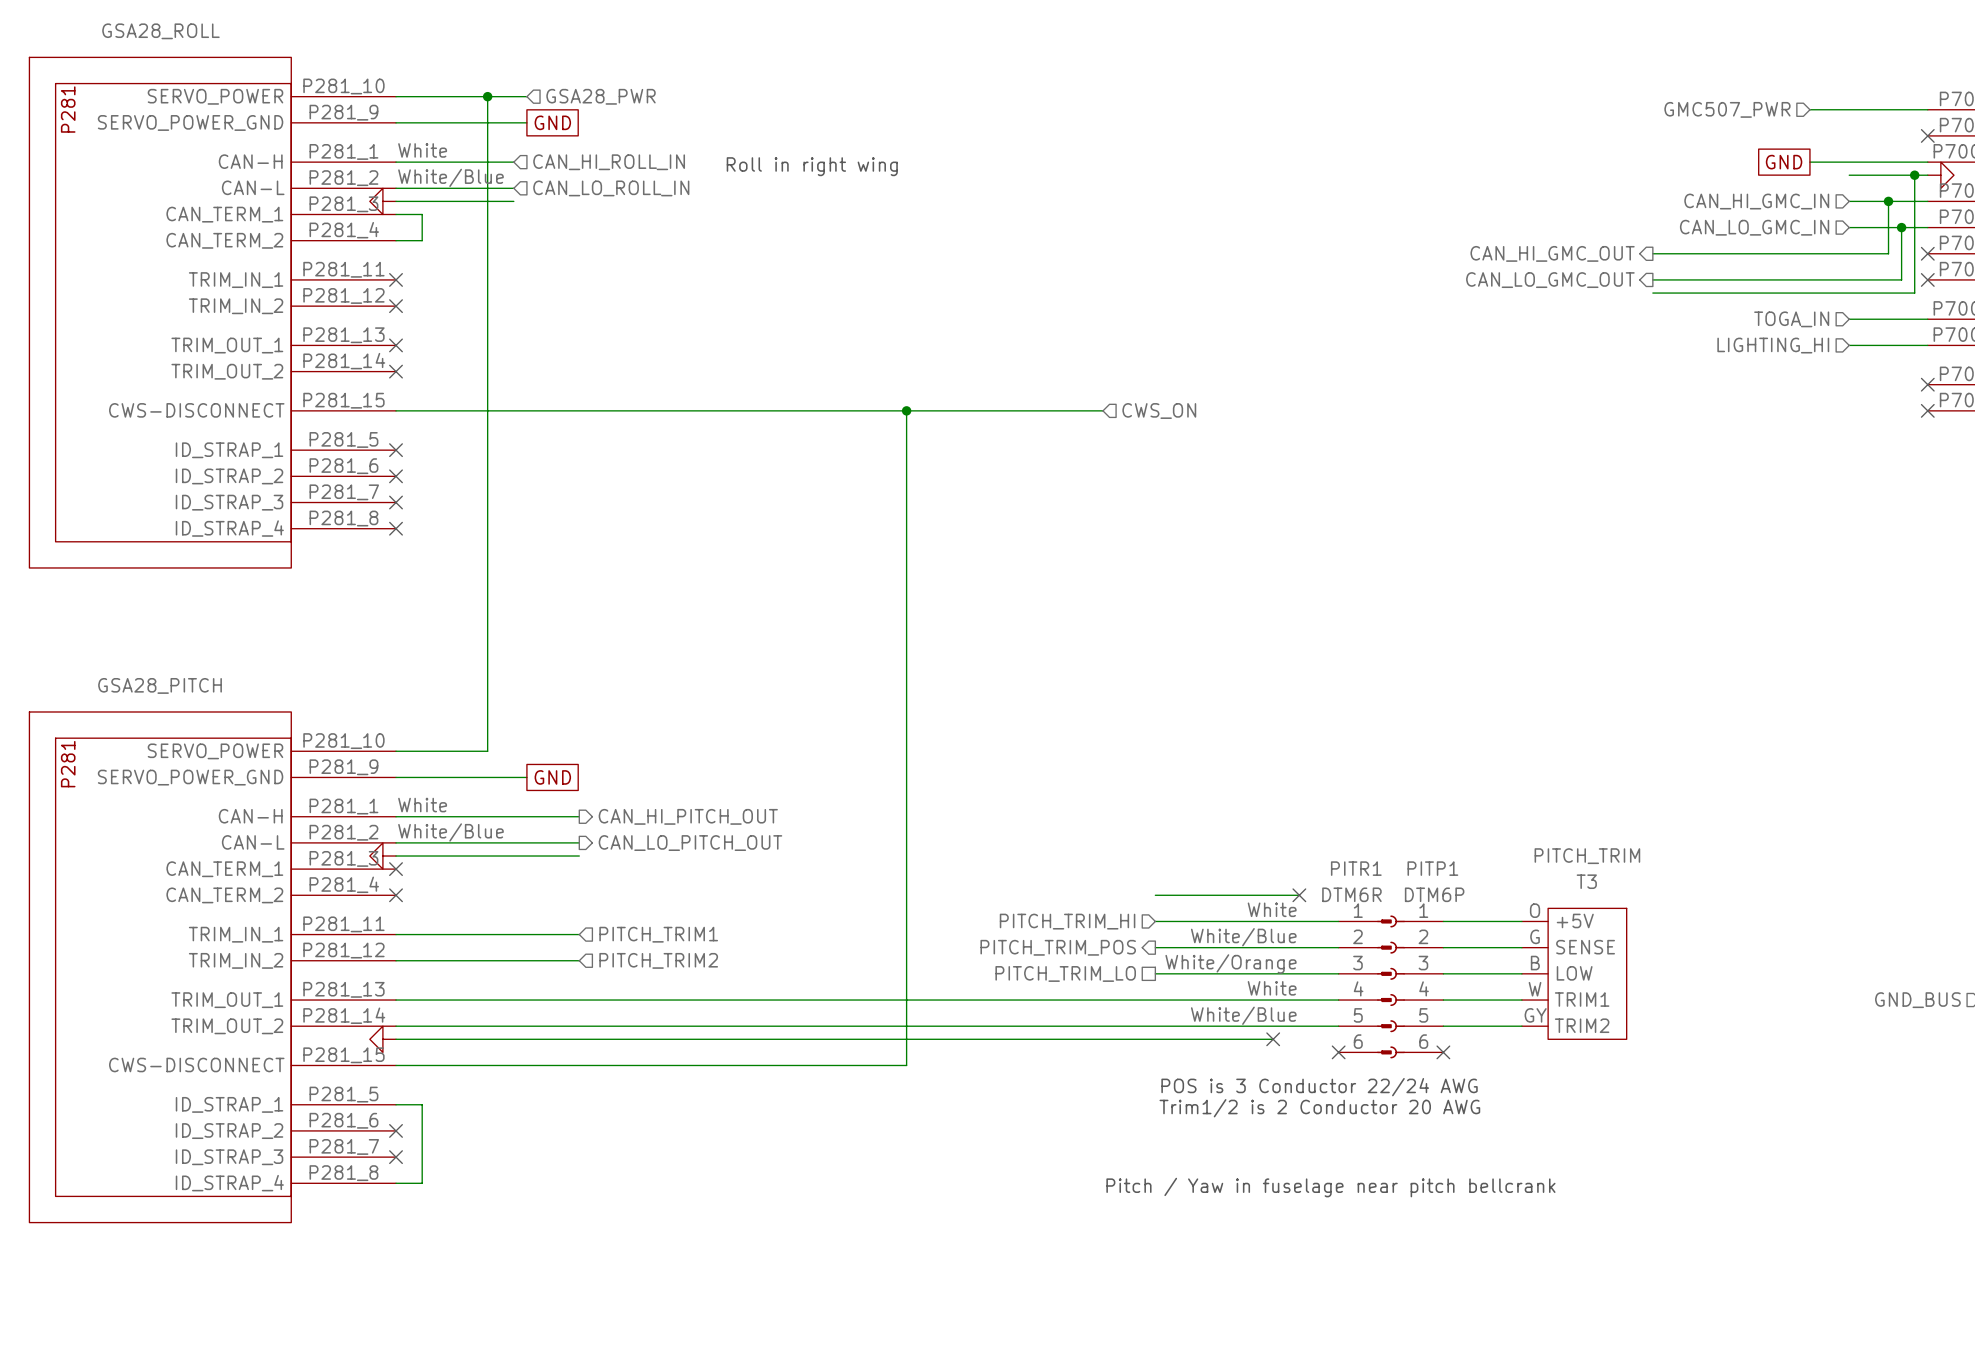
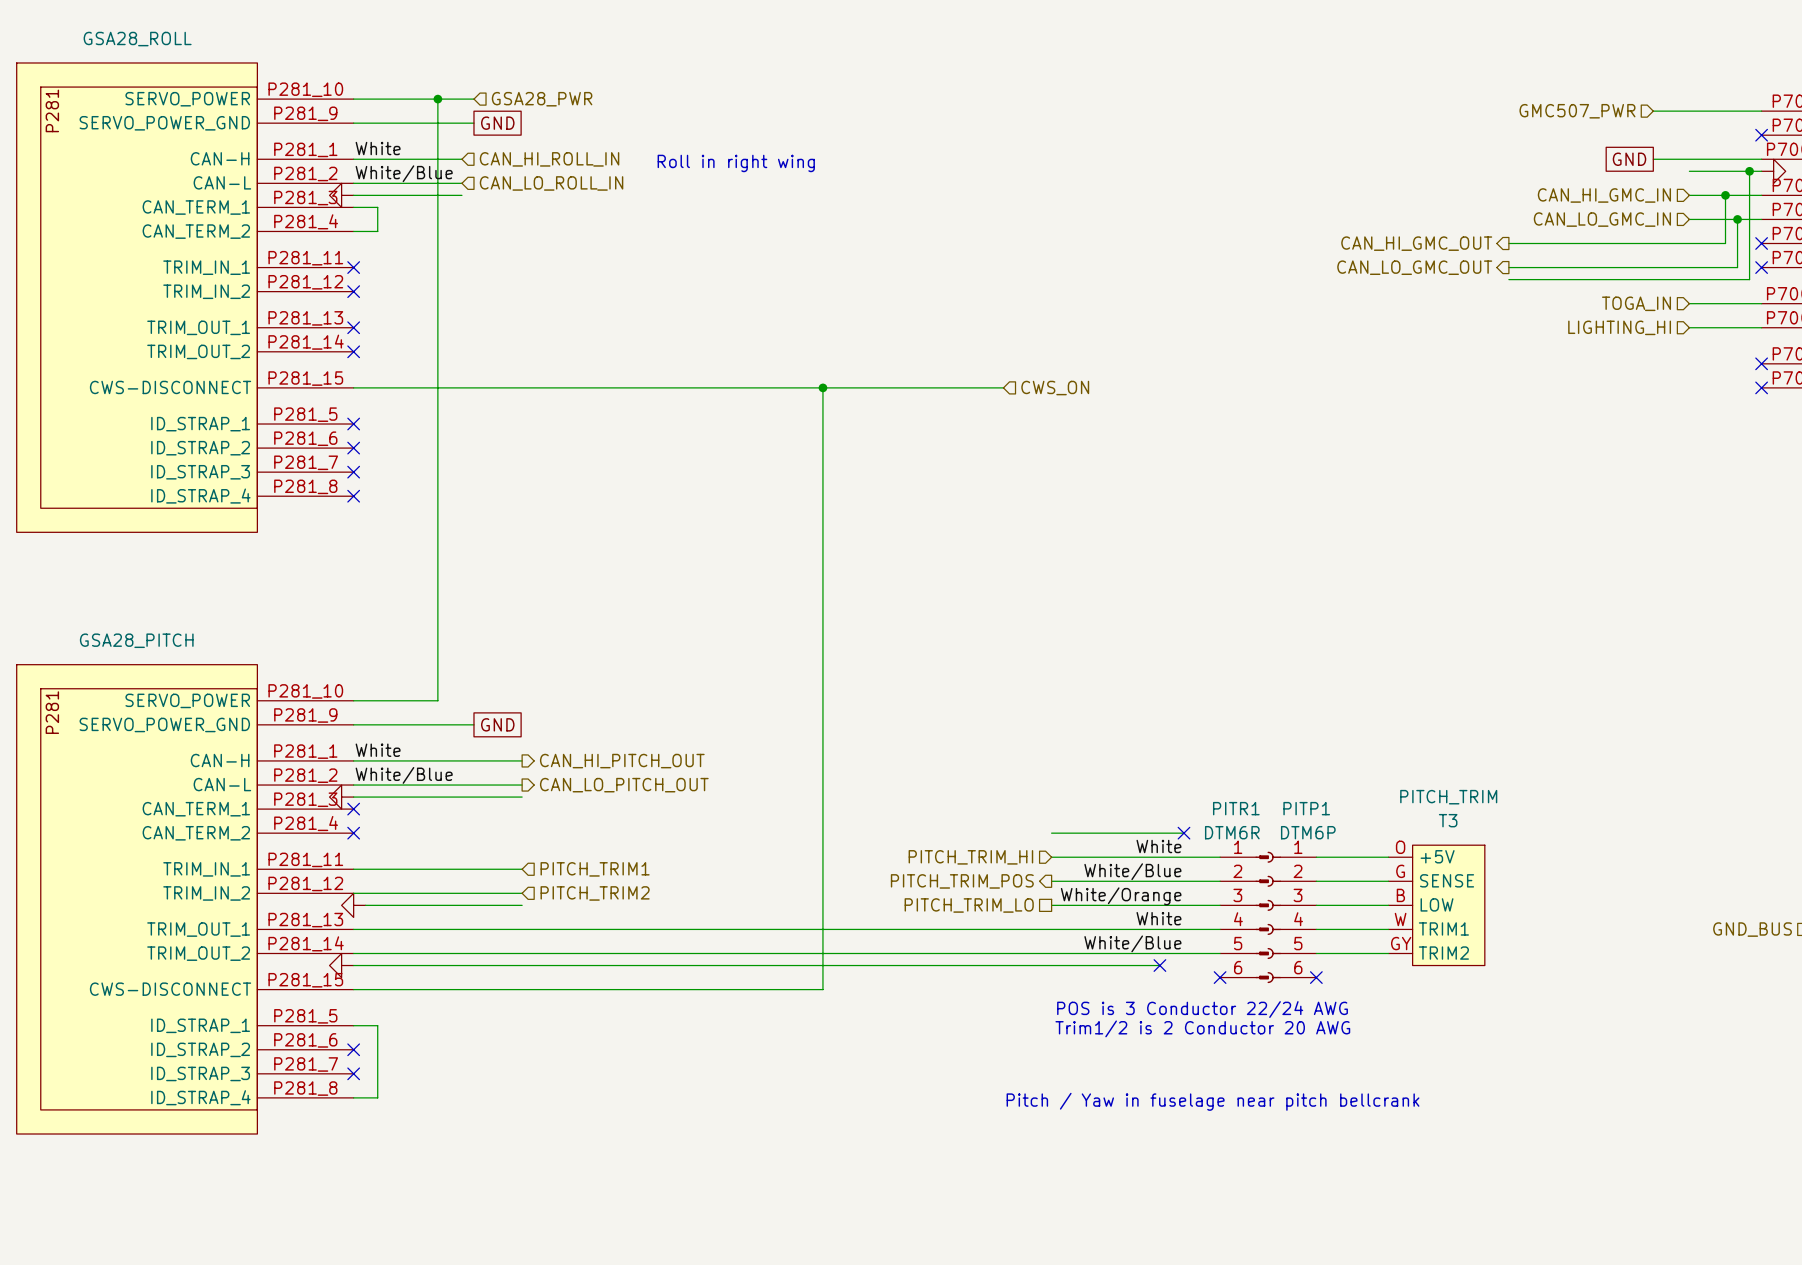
power symbol: none -> (353, 905)
wire: none -> (365, 905) (522, 905)

